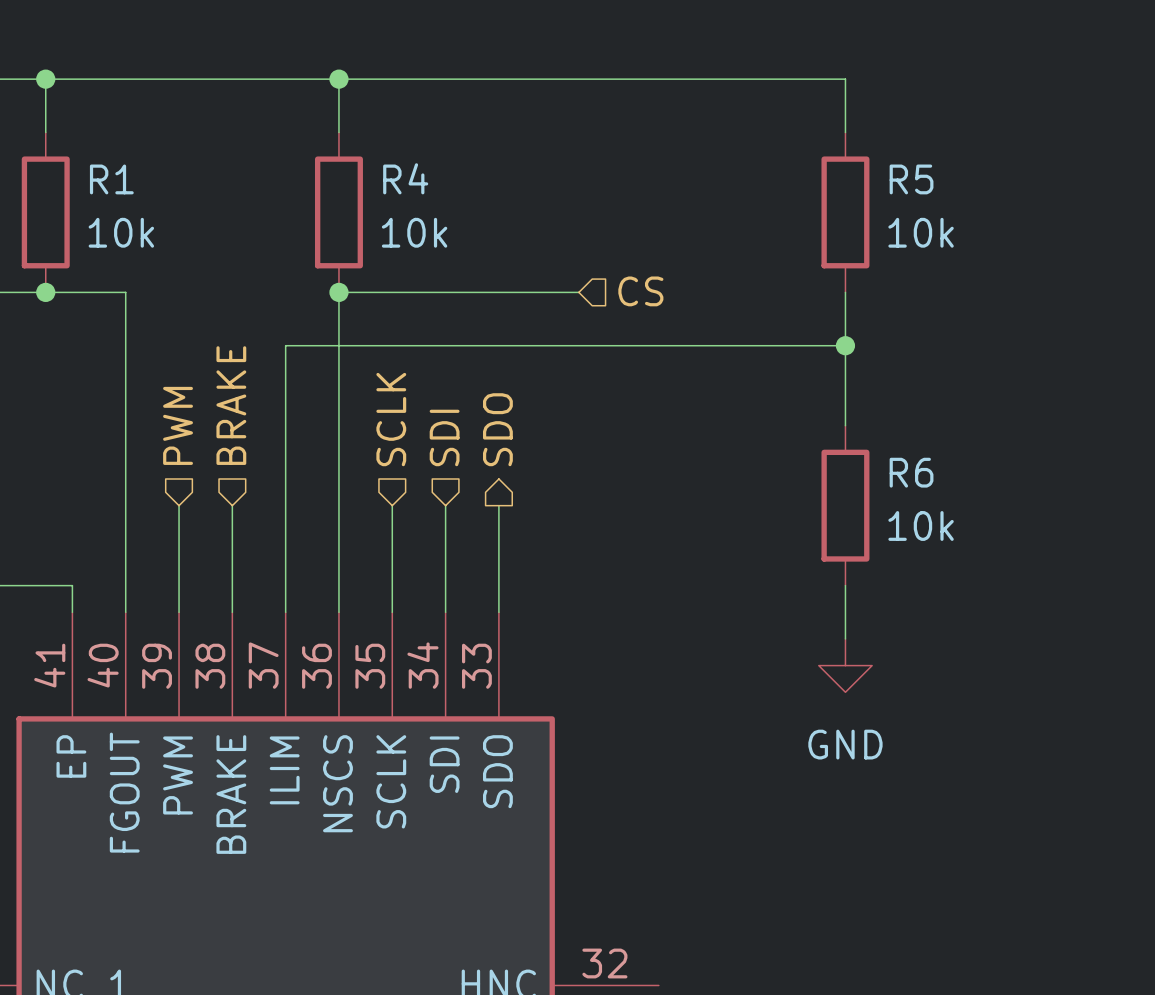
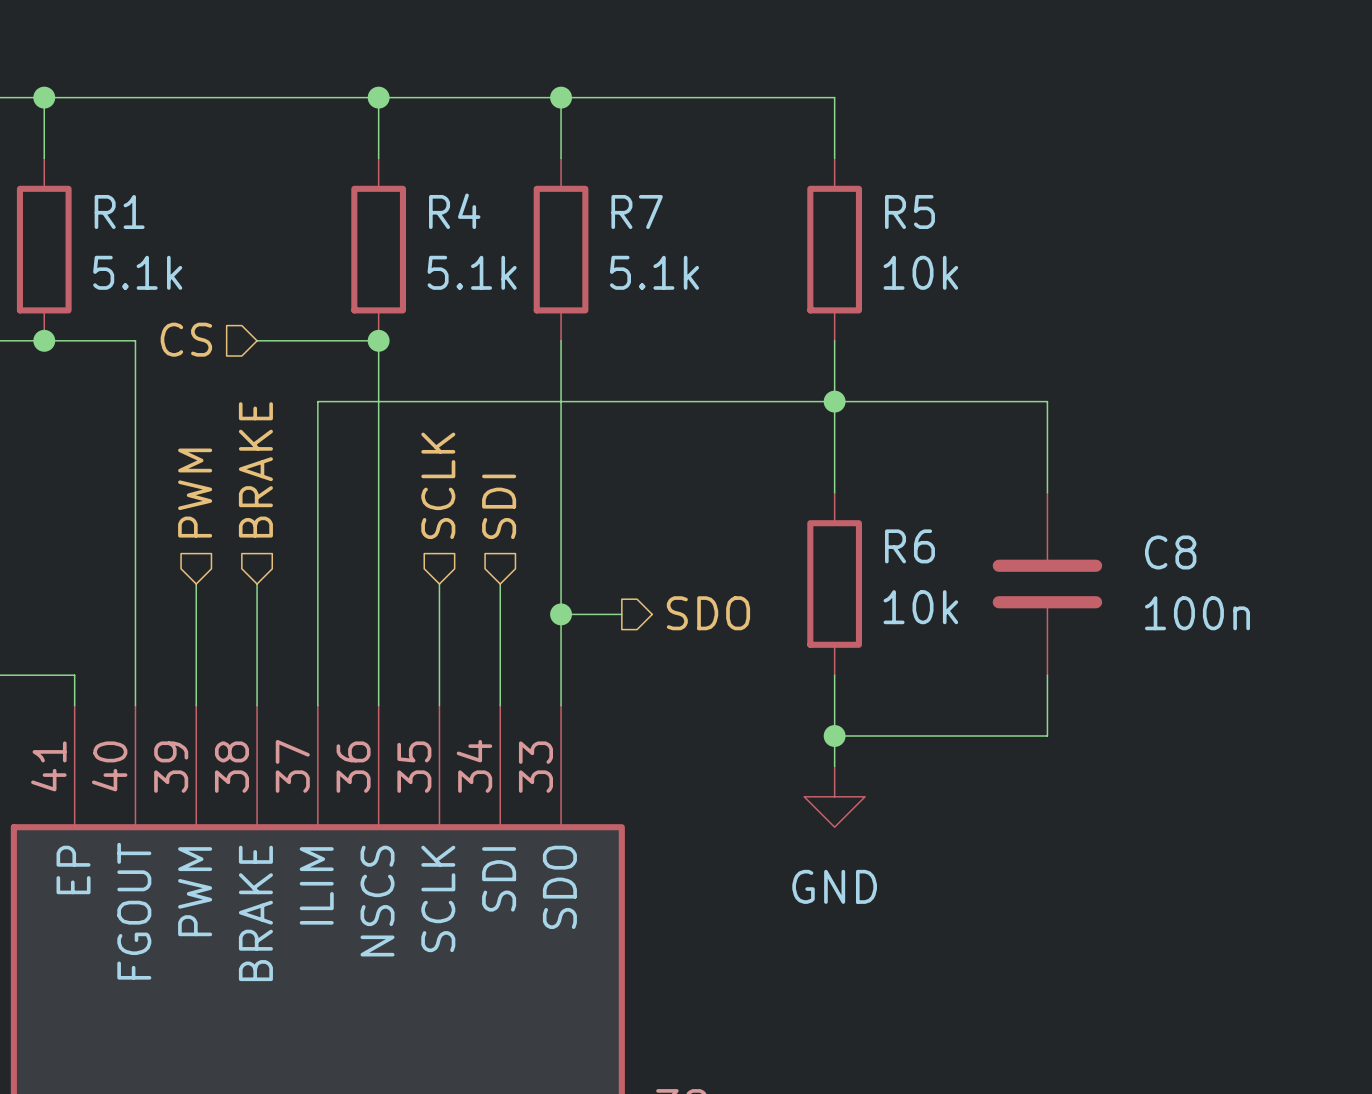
wire: none -> (561, 97) (561, 158)
junction: none -> (561, 97)
wire: (738, 79) (845, 79) (845, 132) -> (834, 97) (834, 158)
R7: none -> 5.1k (561, 249)
R5 position: (845, 212) -> (834, 249)
R1 value: 10k (121, 232) -> 5.1k (137, 272)
R4 value: 10k (414, 232) -> 5.1k (472, 272)
hierarchical label rotation: 0° (640, 291) -> 180° (186, 339)
hierarchical label position: CS (640, 291) -> CS (186, 339)
wire: (338, 292) (578, 292) -> (378, 340) (257, 340)
wire: none -> (561, 340) (561, 584)
wire: (845, 292) (845, 425) -> (834, 340) (834, 492)
wire: none -> (956, 401) (1047, 401) (1047, 492)
junction position: (845, 345) -> (834, 401)
hierarchical label rotation: 0° (497, 429) -> 90° clockwise (708, 613)
hierarchical label position: SDO (497, 429) -> SDO (708, 613)
R6 position: (845, 505) -> (834, 584)
C8: none -> 100n (1047, 584)
wire: none -> (561, 614) (621, 614)
junction: none -> (561, 614)
wire: none -> (834, 675) (834, 766)
wire: (845, 585) (845, 638) -> none
wire: none -> (1047, 675) (1047, 735) (834, 735)
junction: none -> (834, 735)
power symbol position: GND (845, 665) -> GND (834, 796)

